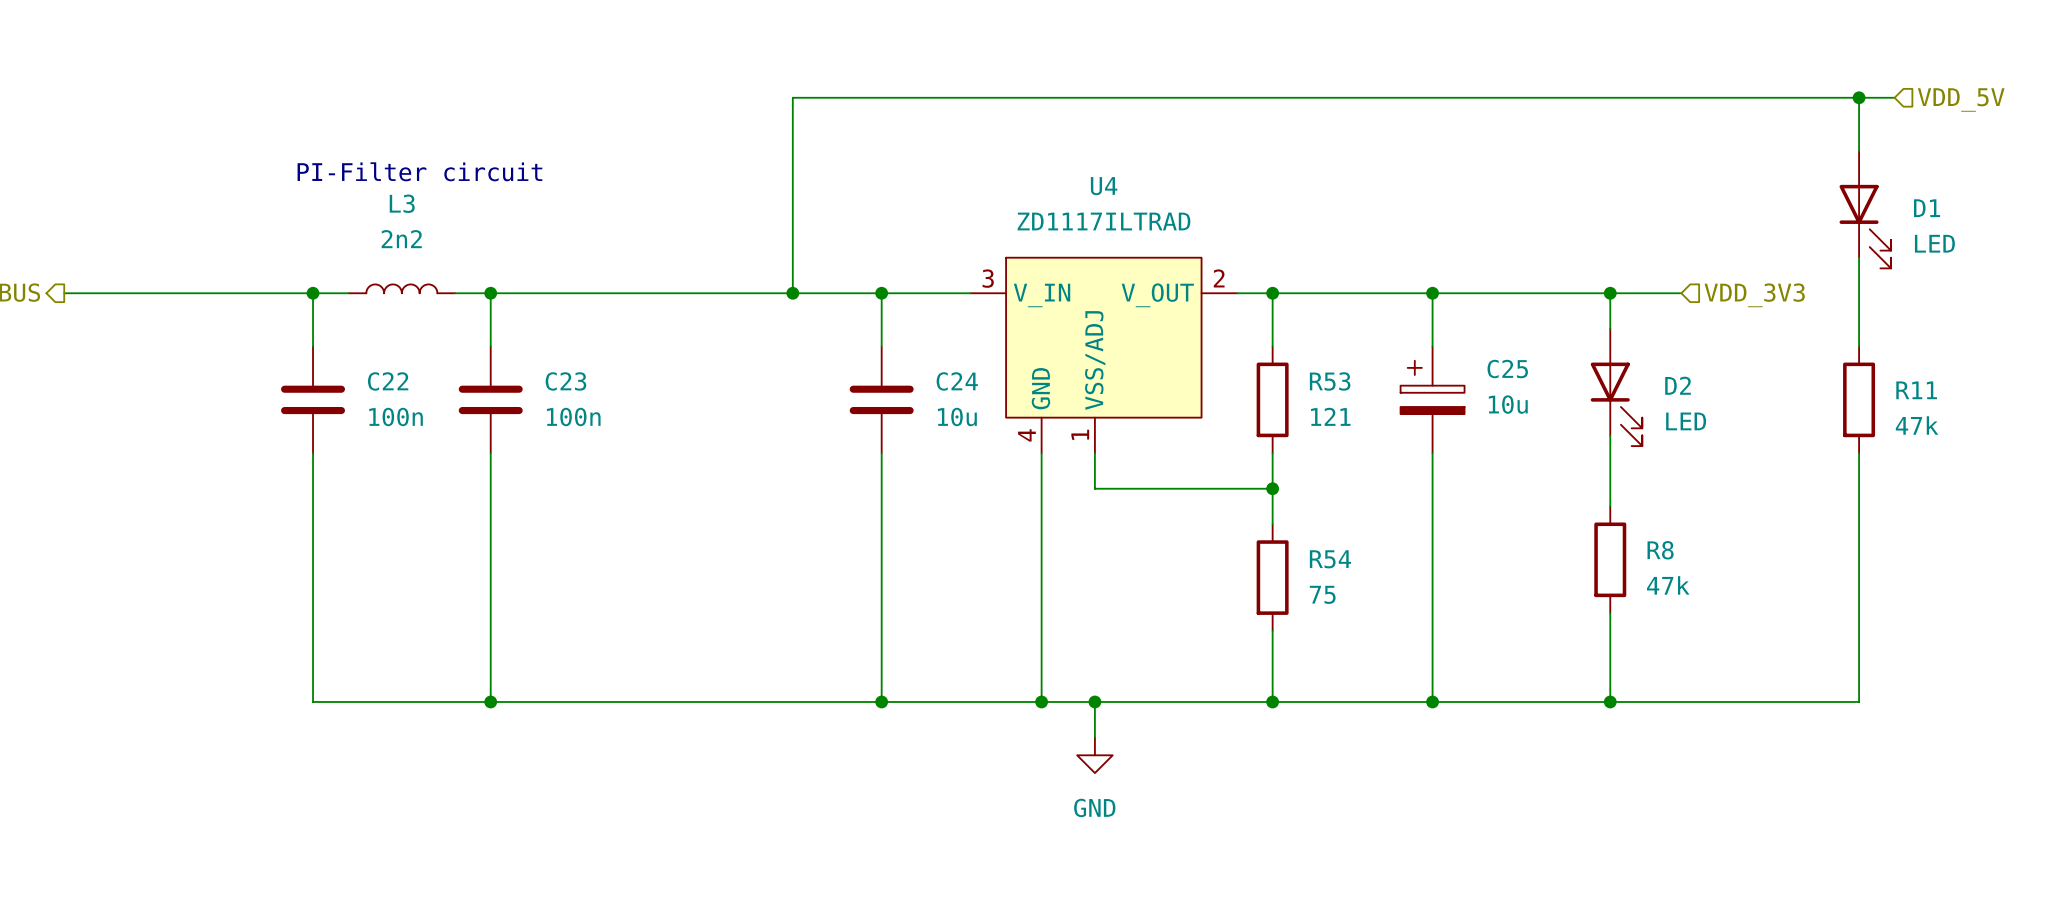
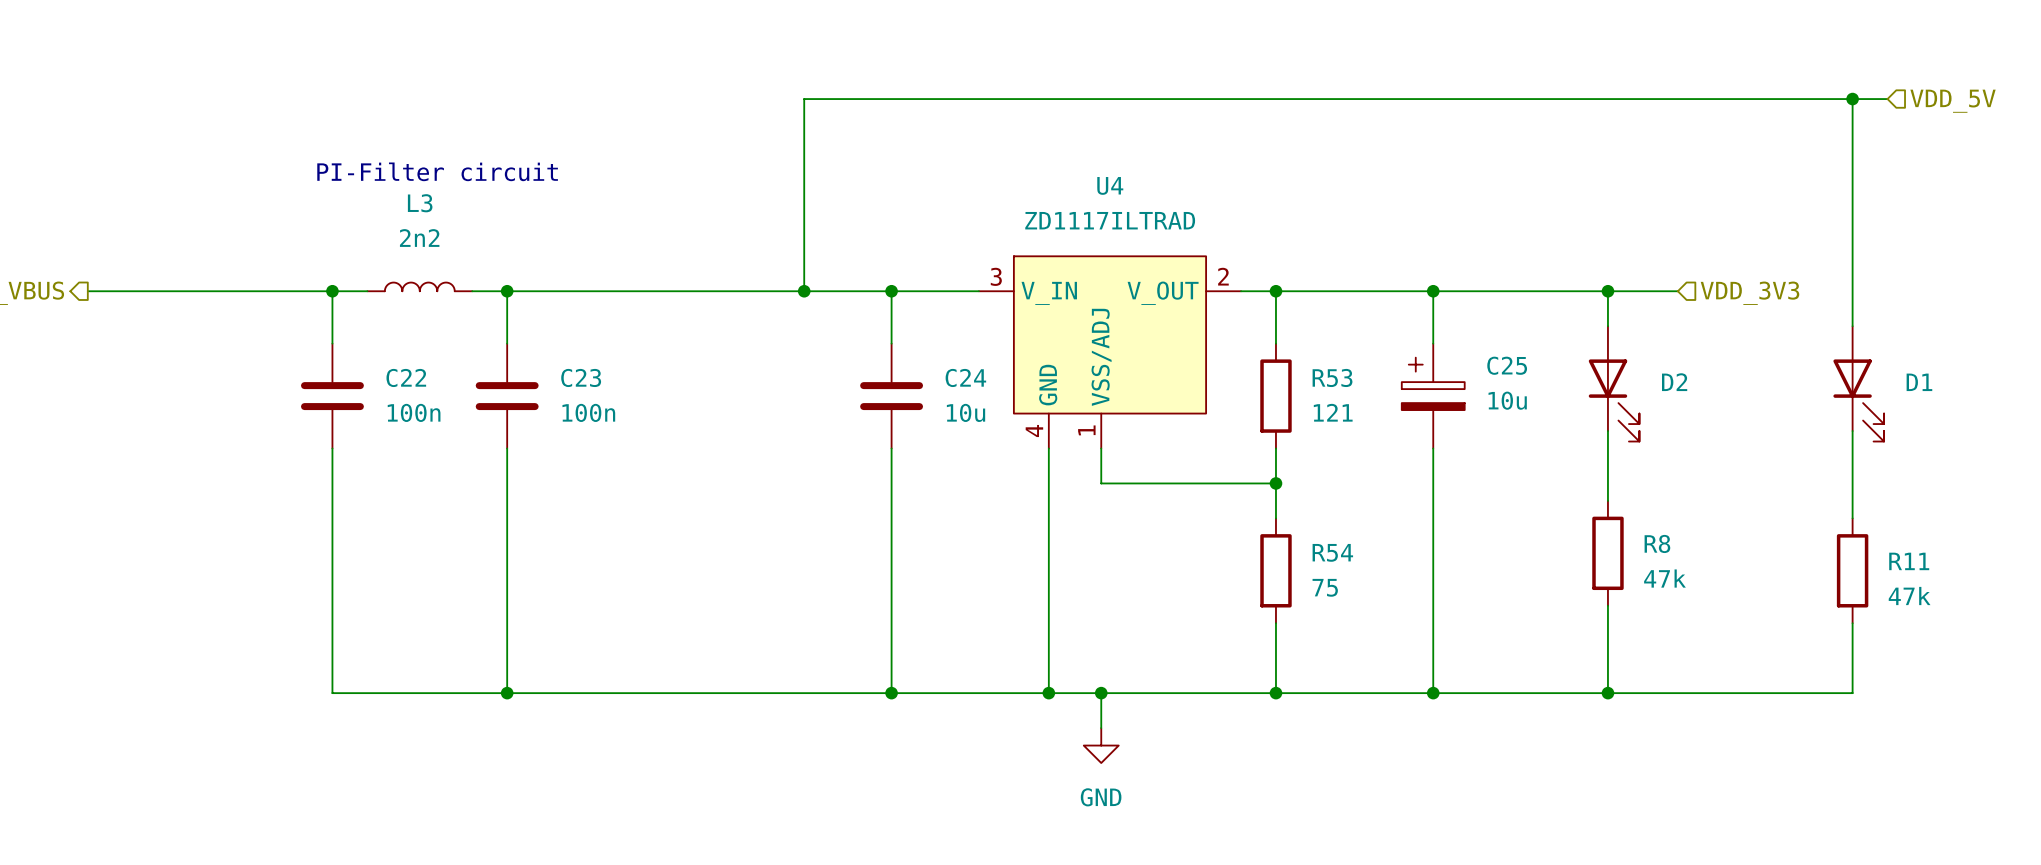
D1 position: (1865, 209) -> (1858, 383)
D1 value: LED (1934, 243) -> none
R11 position: (1859, 399) -> (1852, 570)
D2 value: LED (1686, 421) -> none
wire: (1859, 524) (1859, 630) -> none

